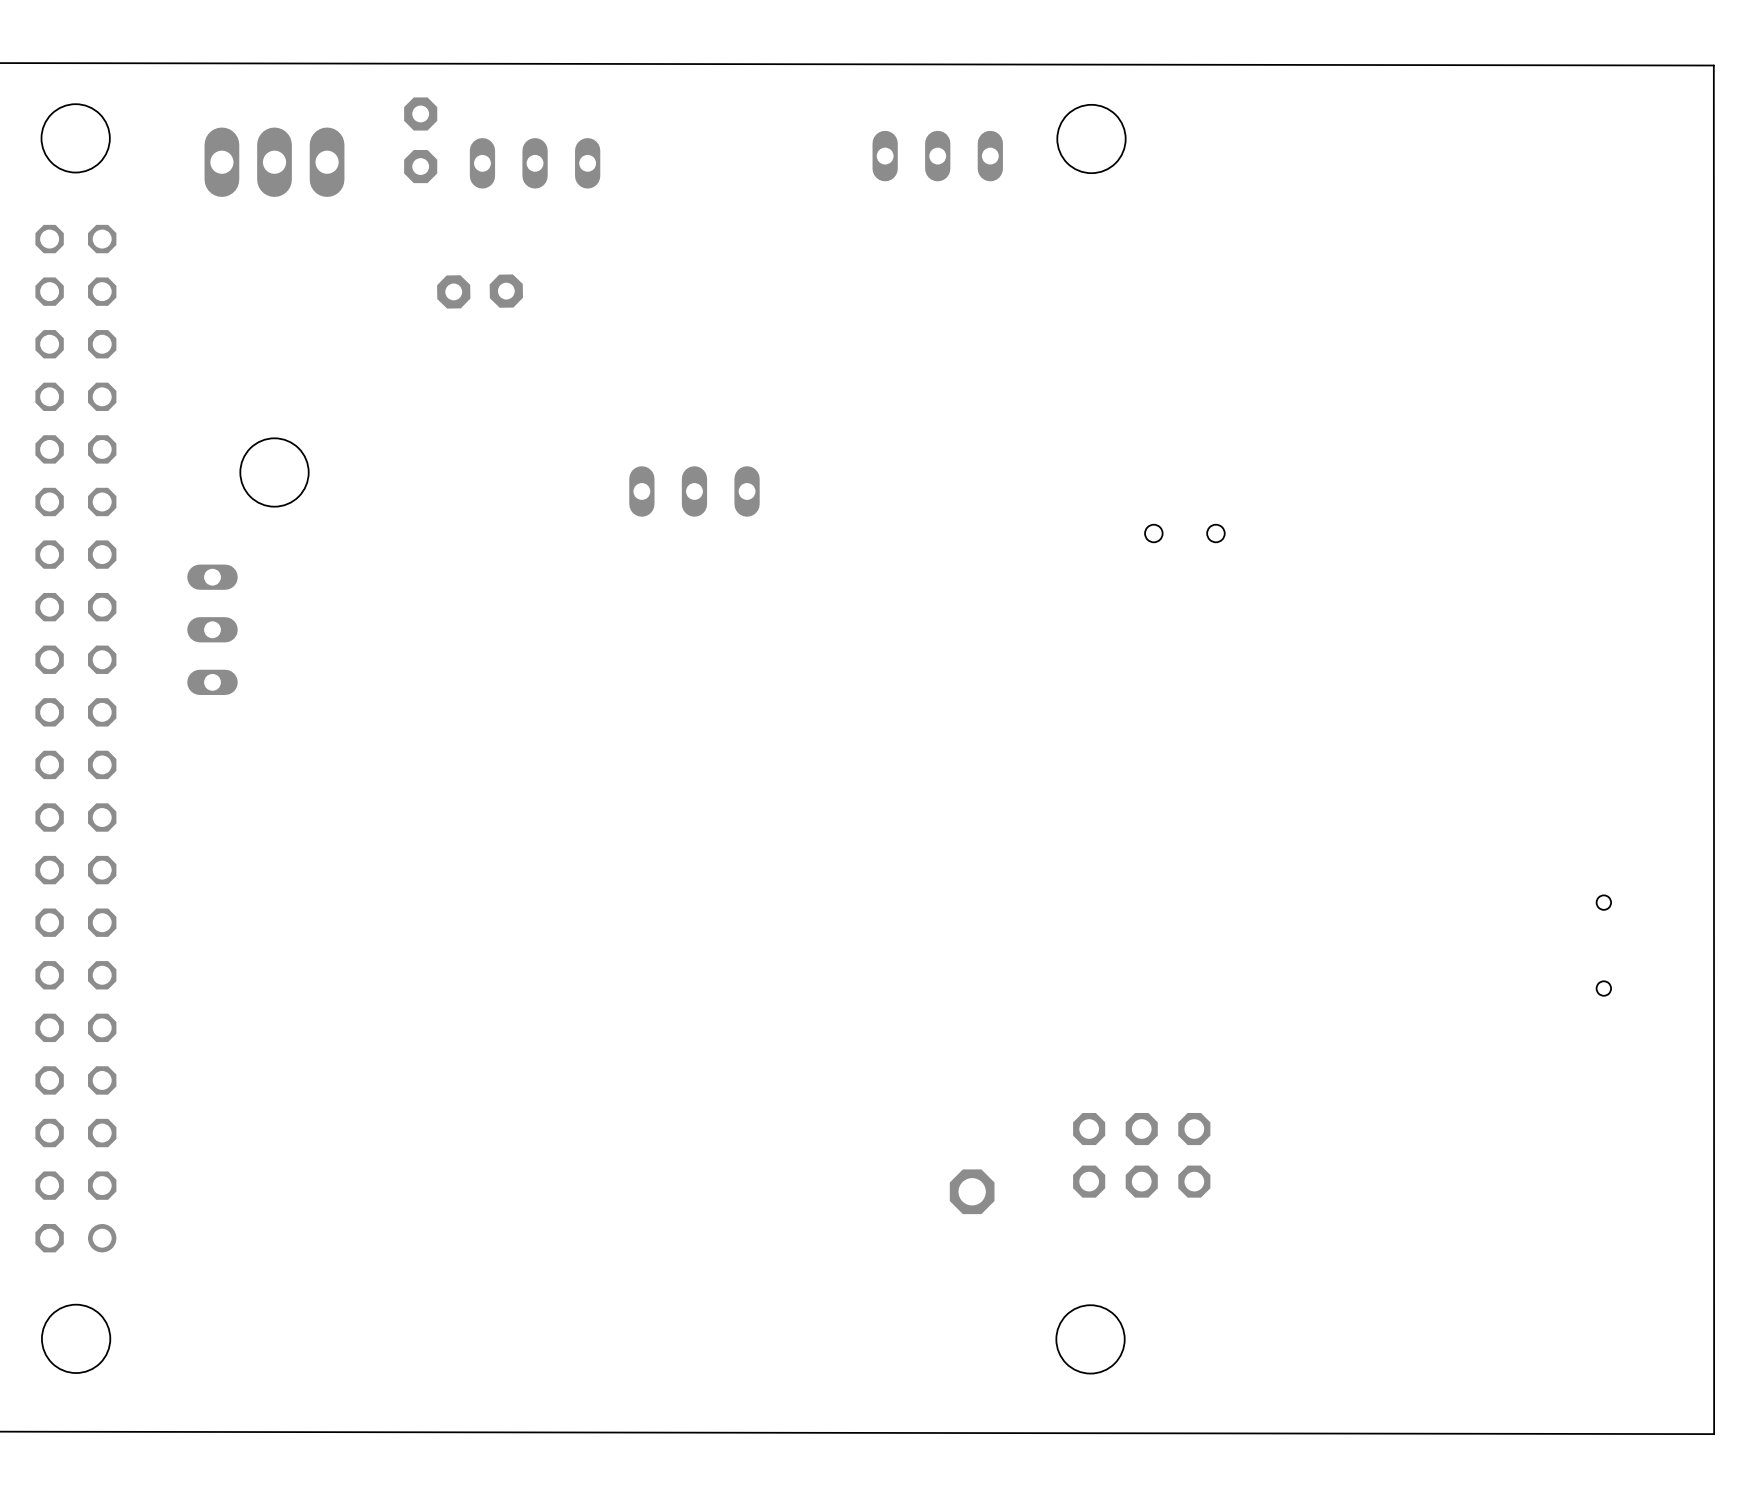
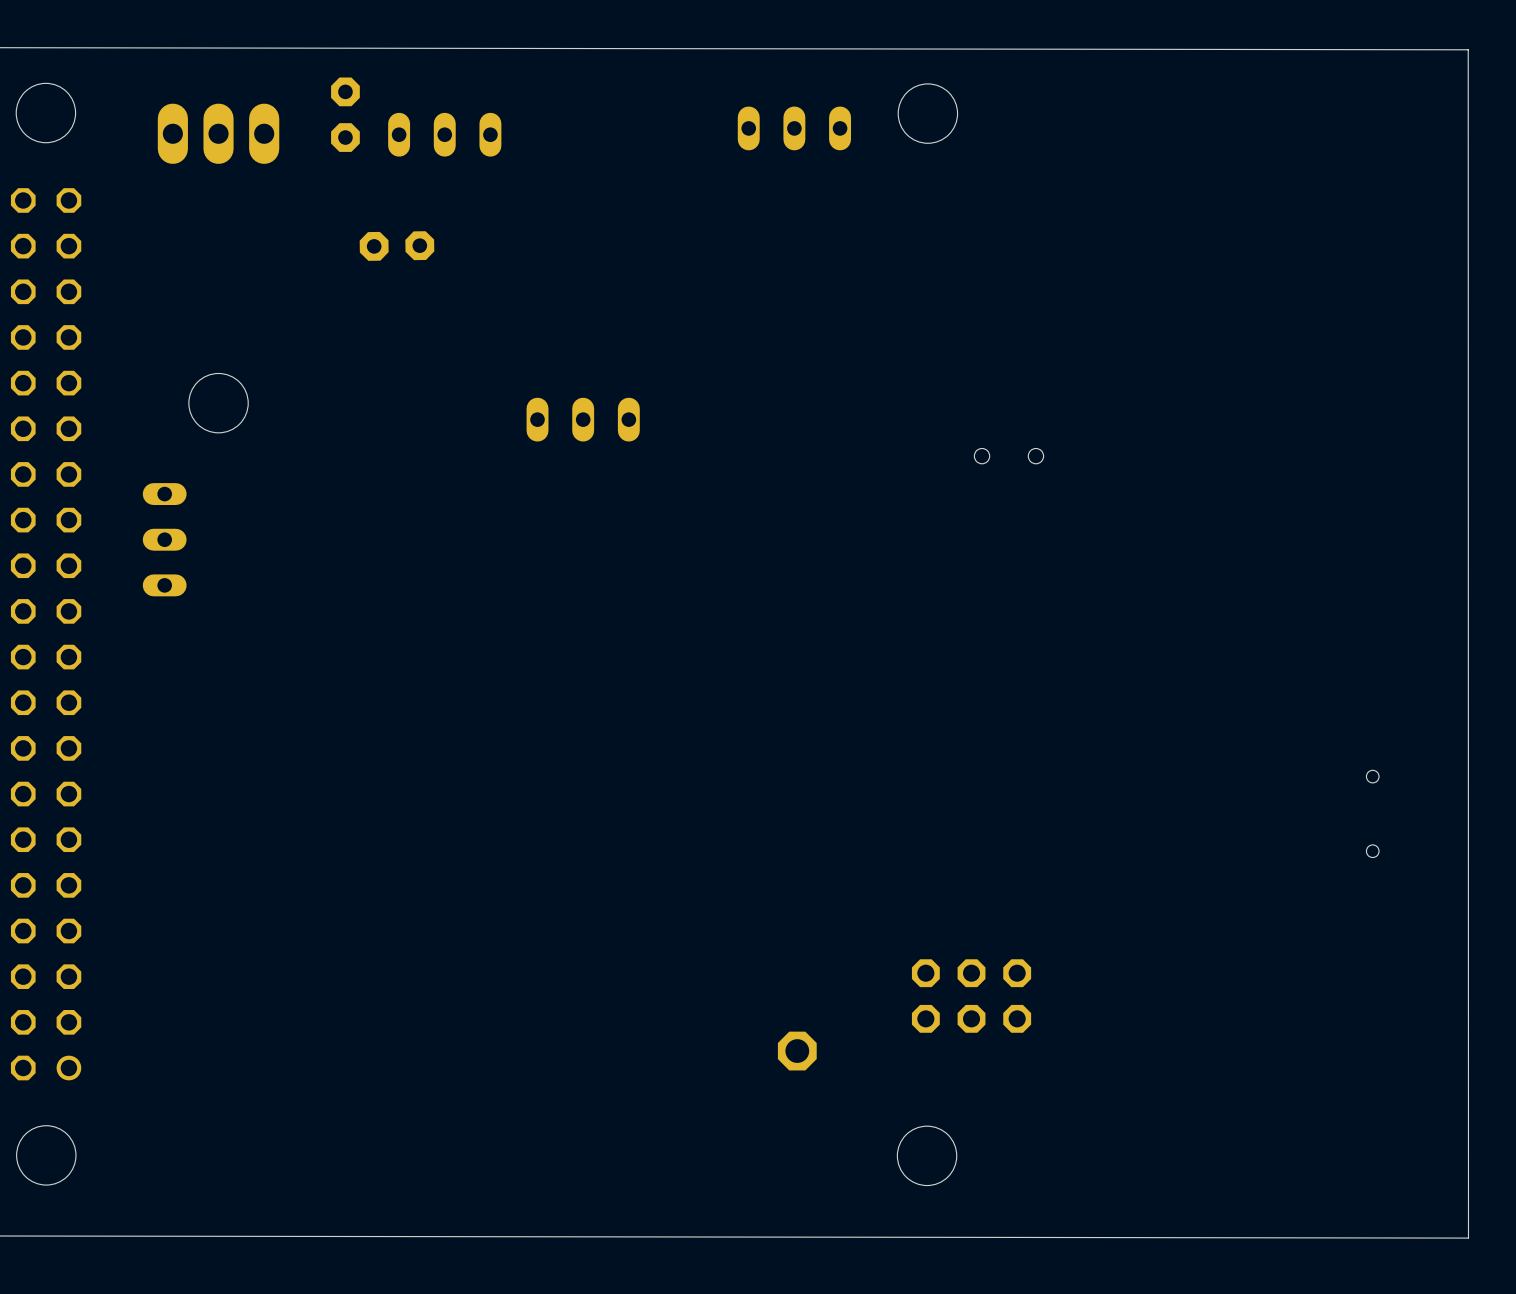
part position: (972, 1191) -> (797, 1051)

